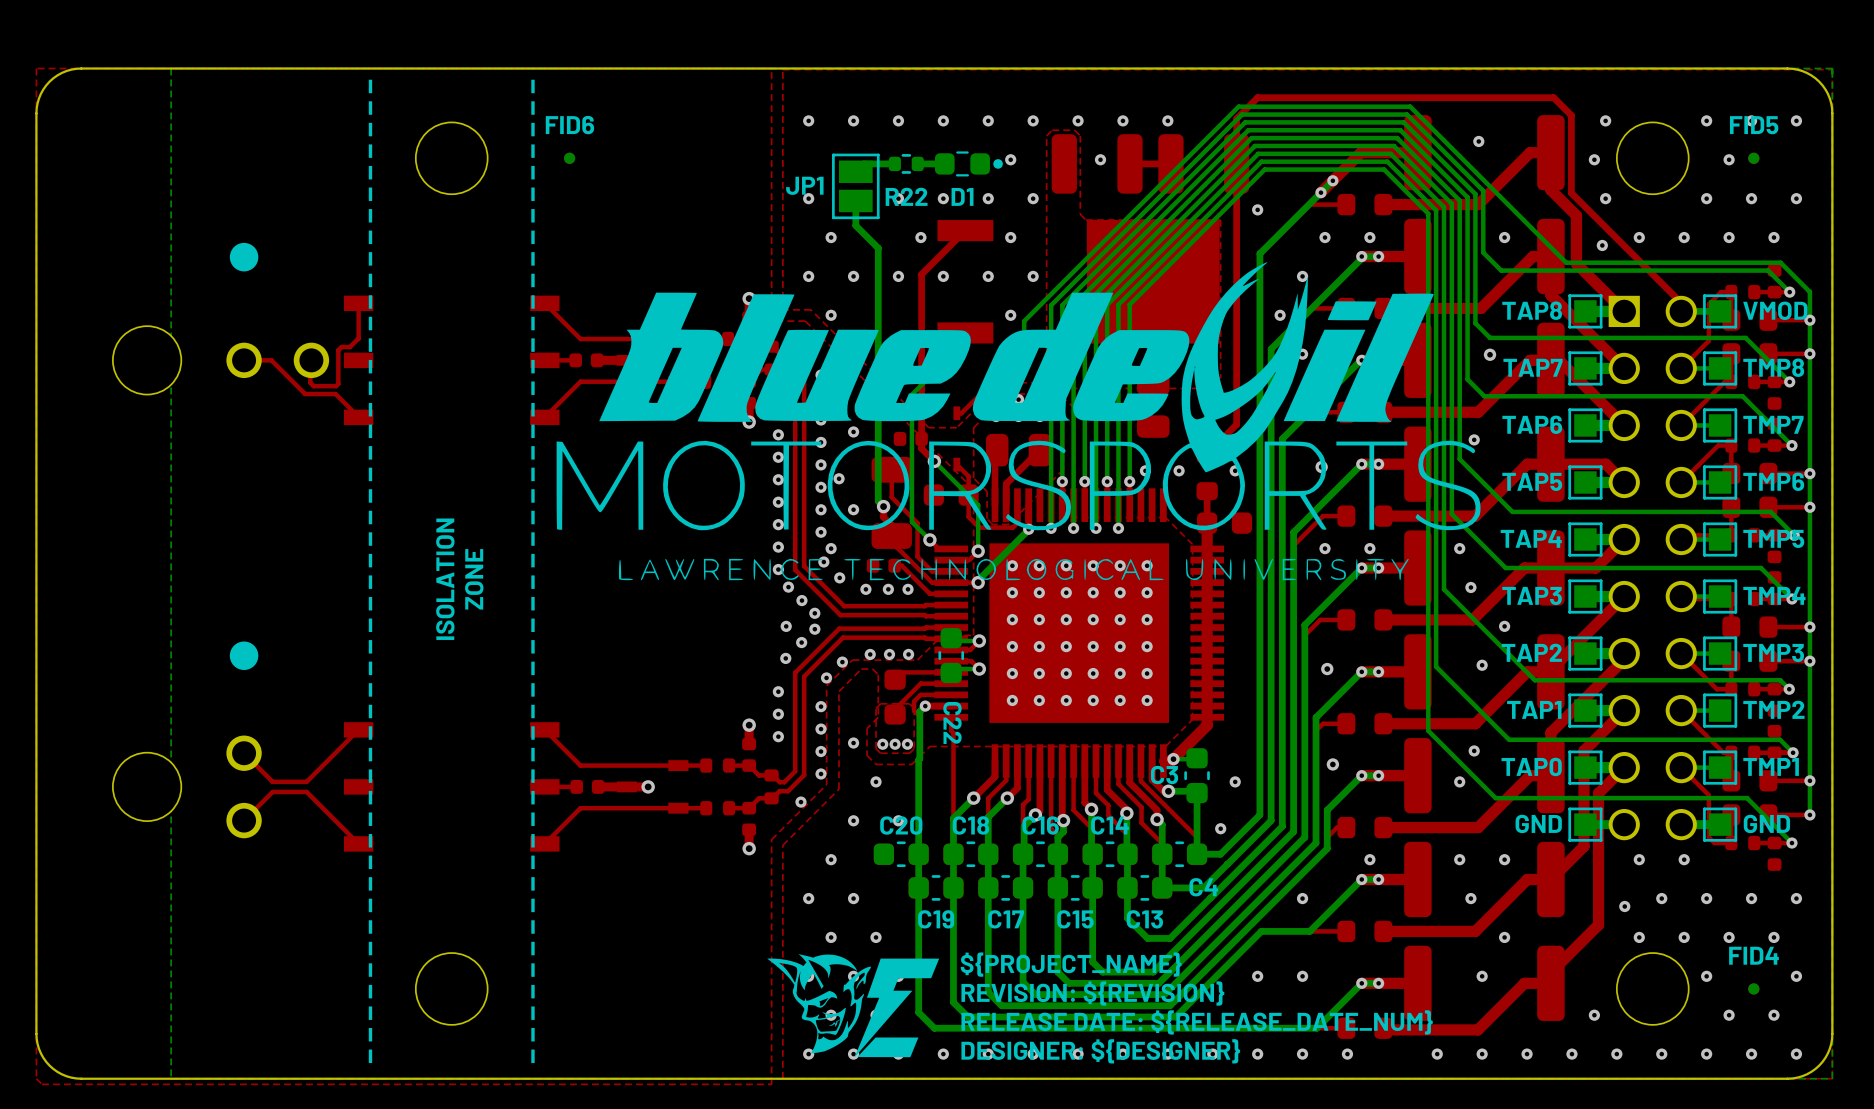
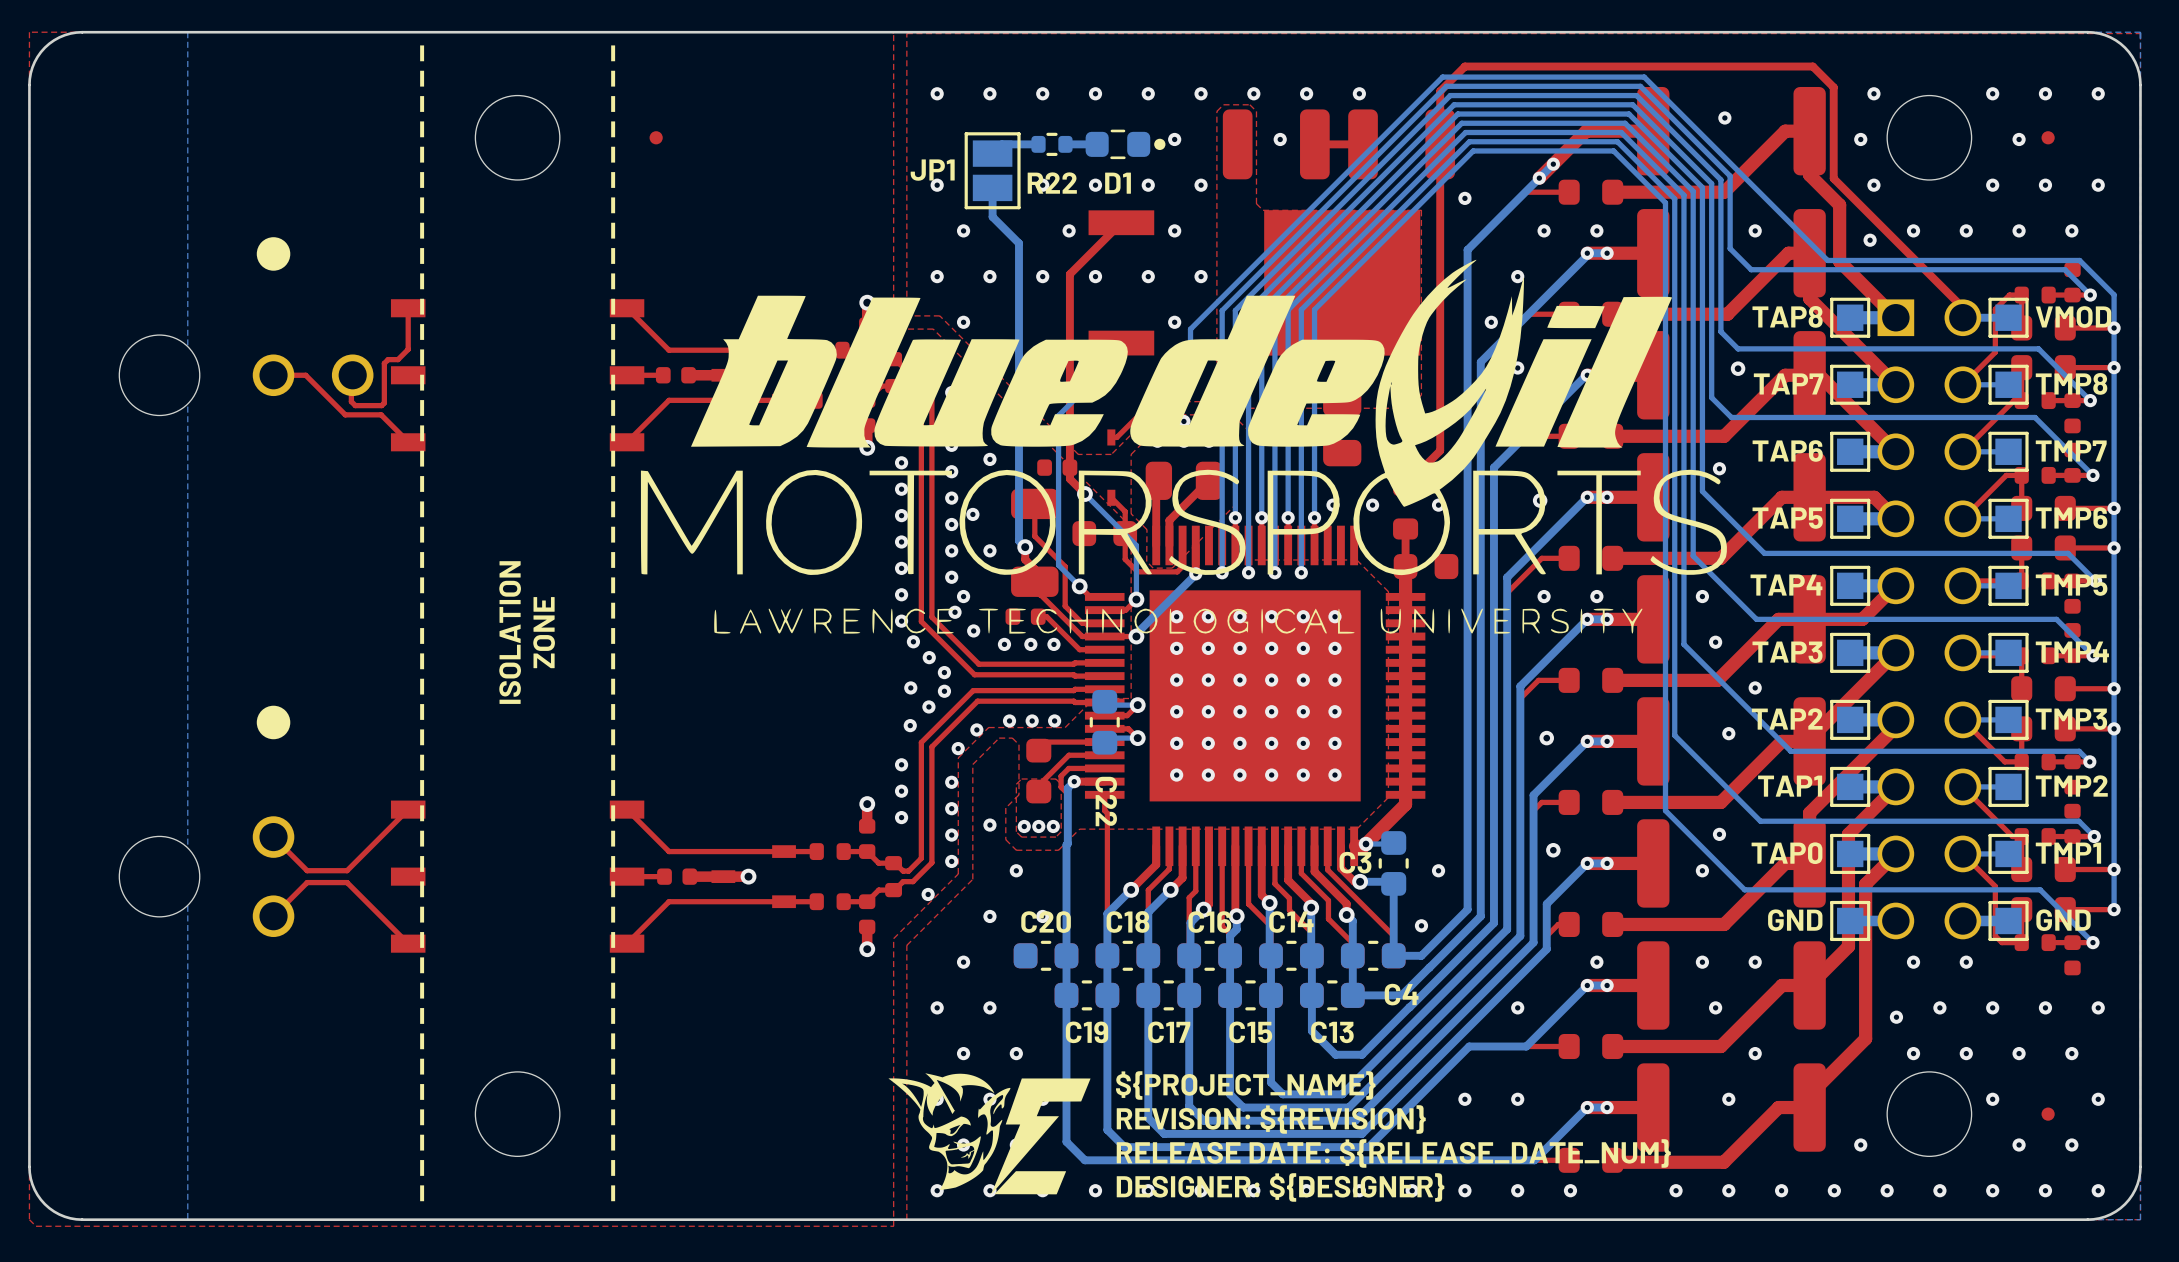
FID6: (569, 158) -> none
FID5: (1753, 158) -> none
FID4: (1753, 988) -> none

